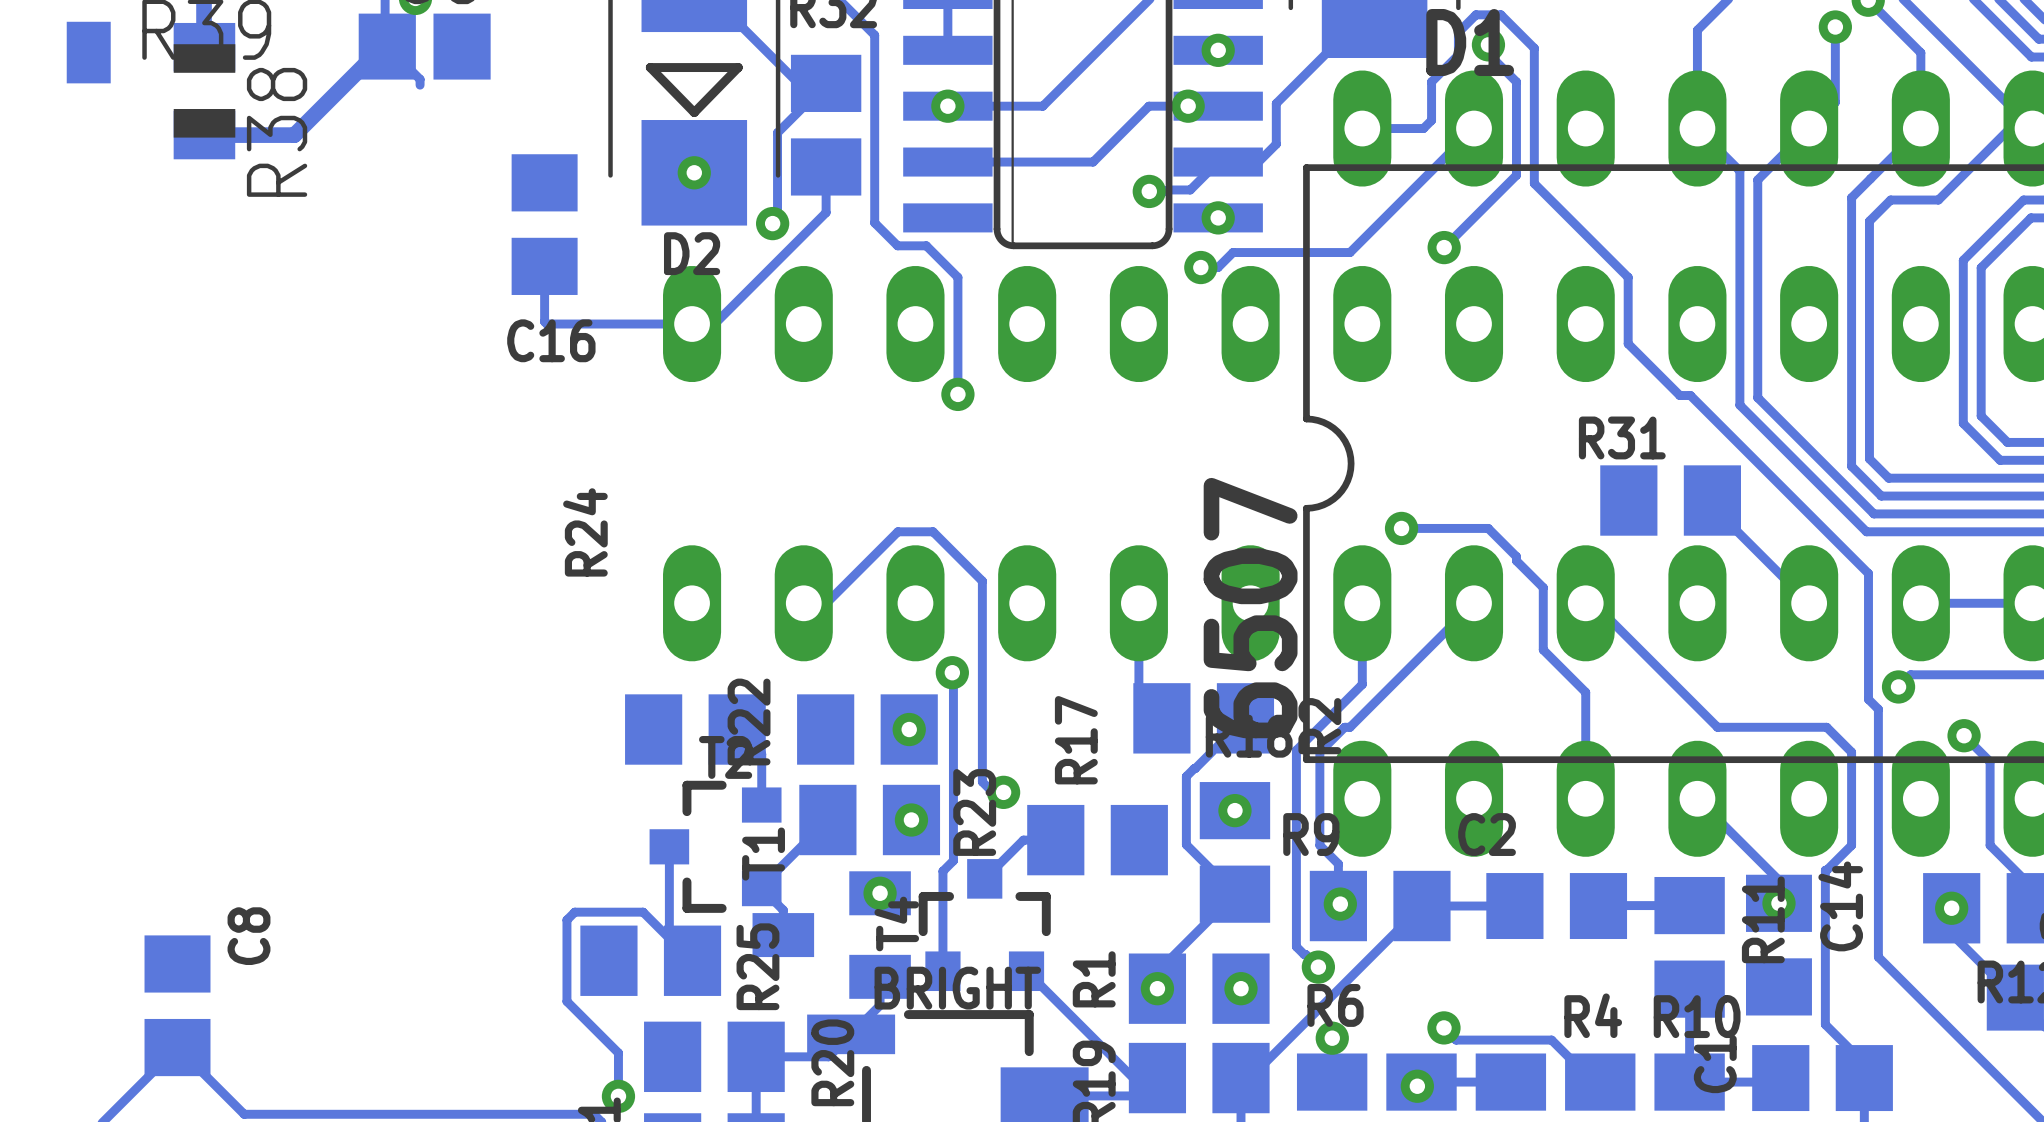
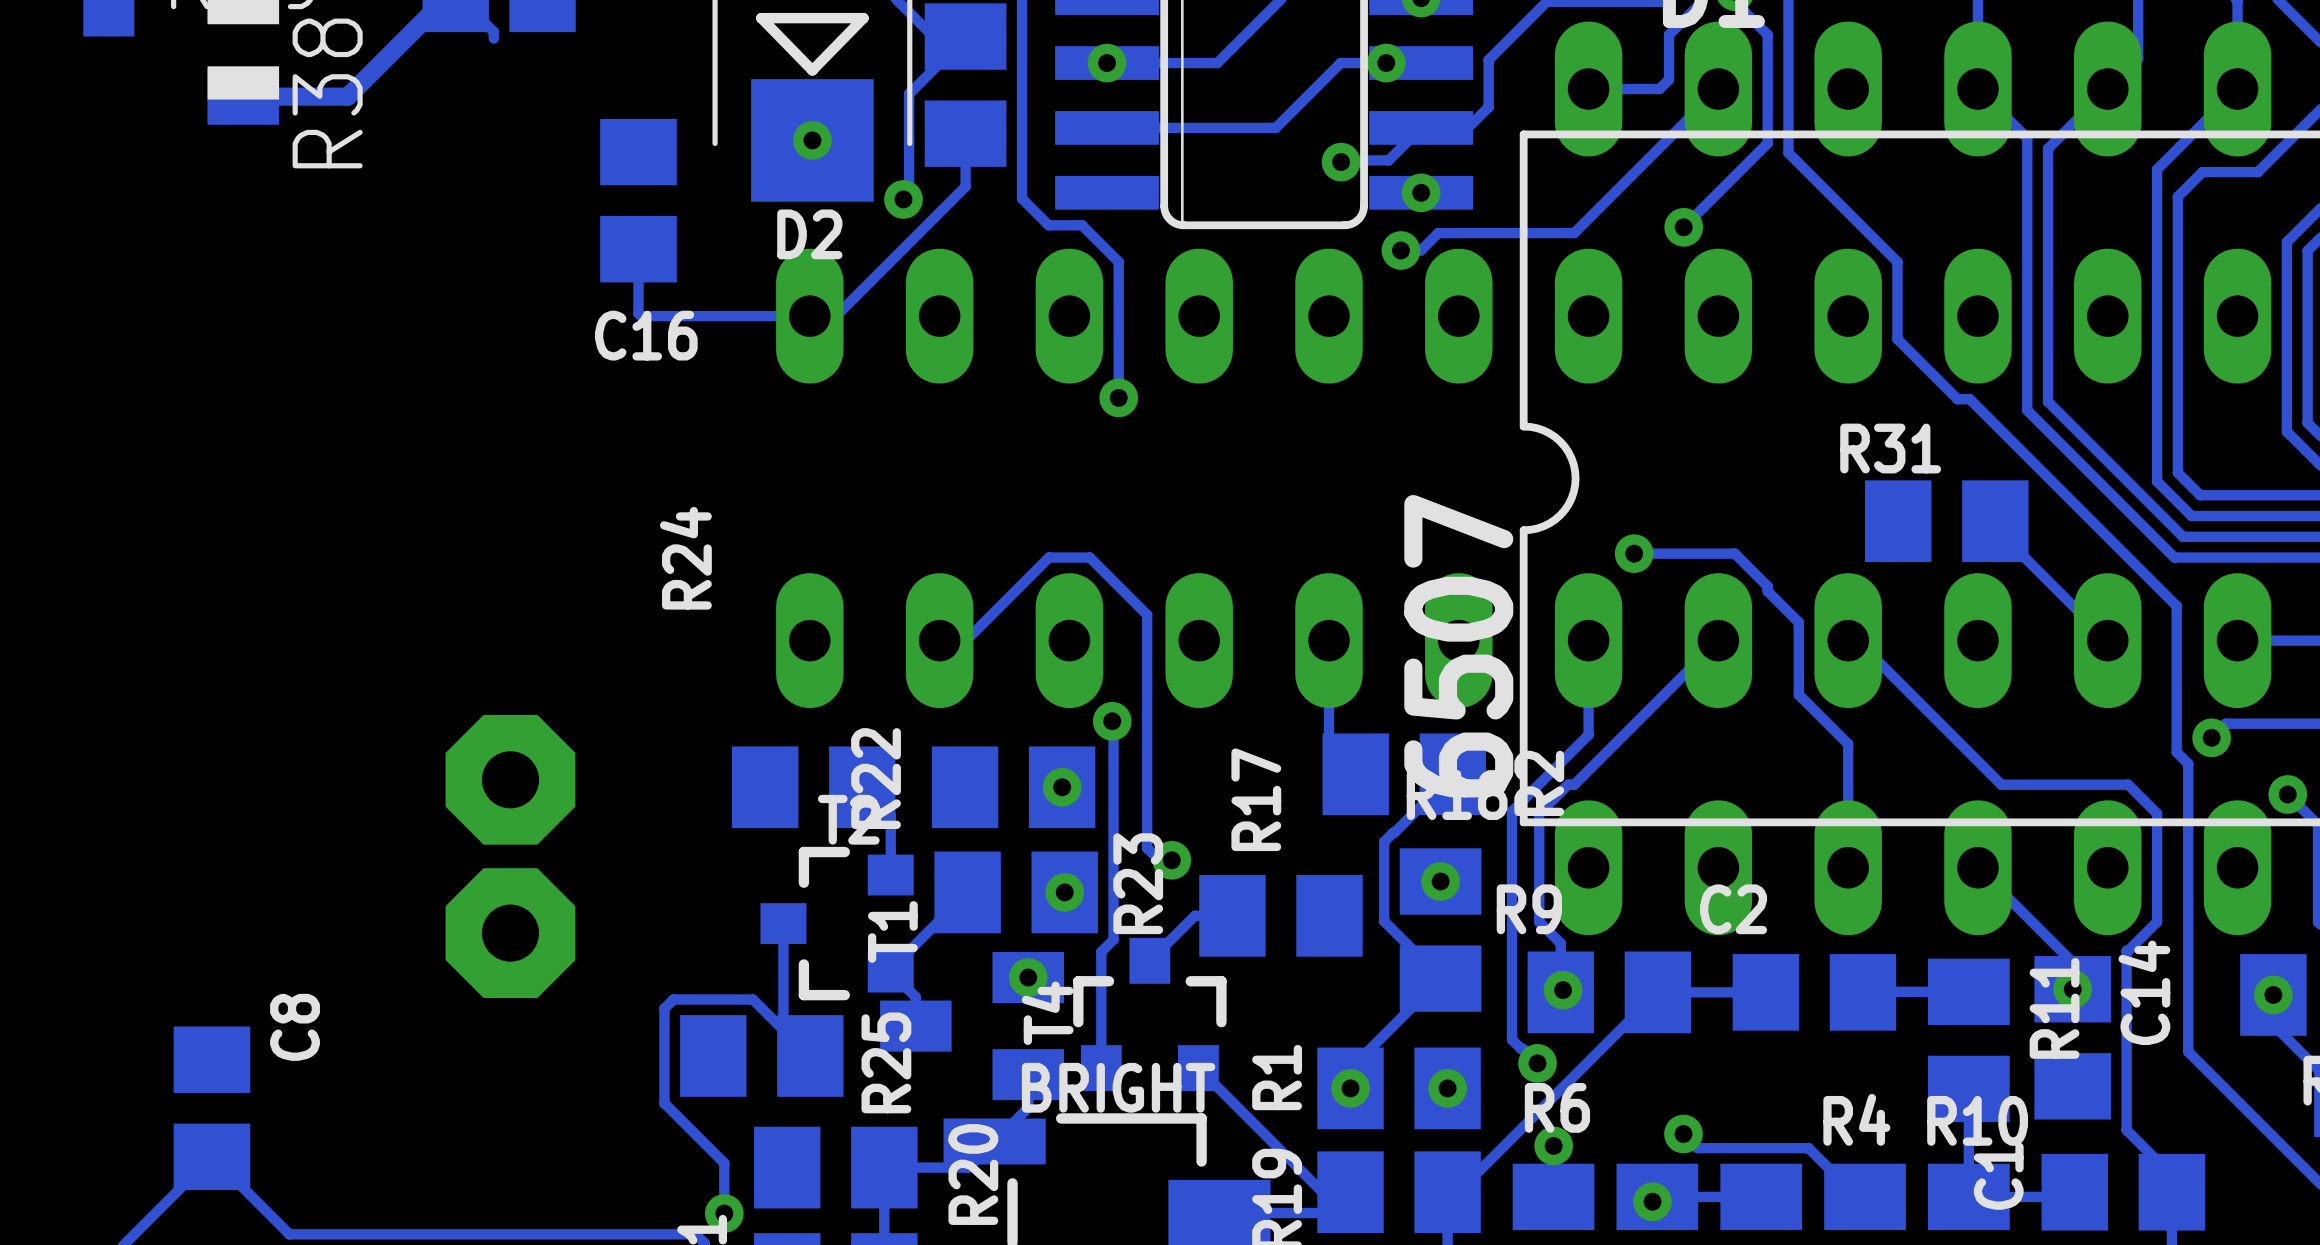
part: none -> (510, 779)
part: none -> (510, 933)

